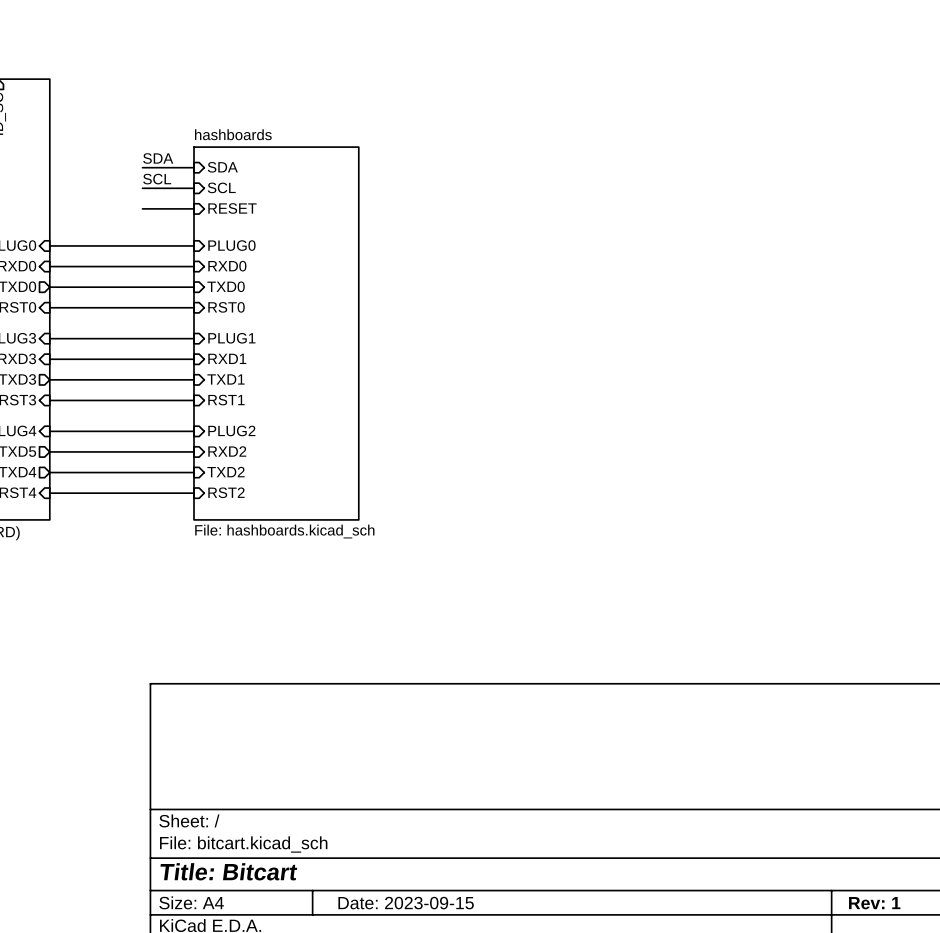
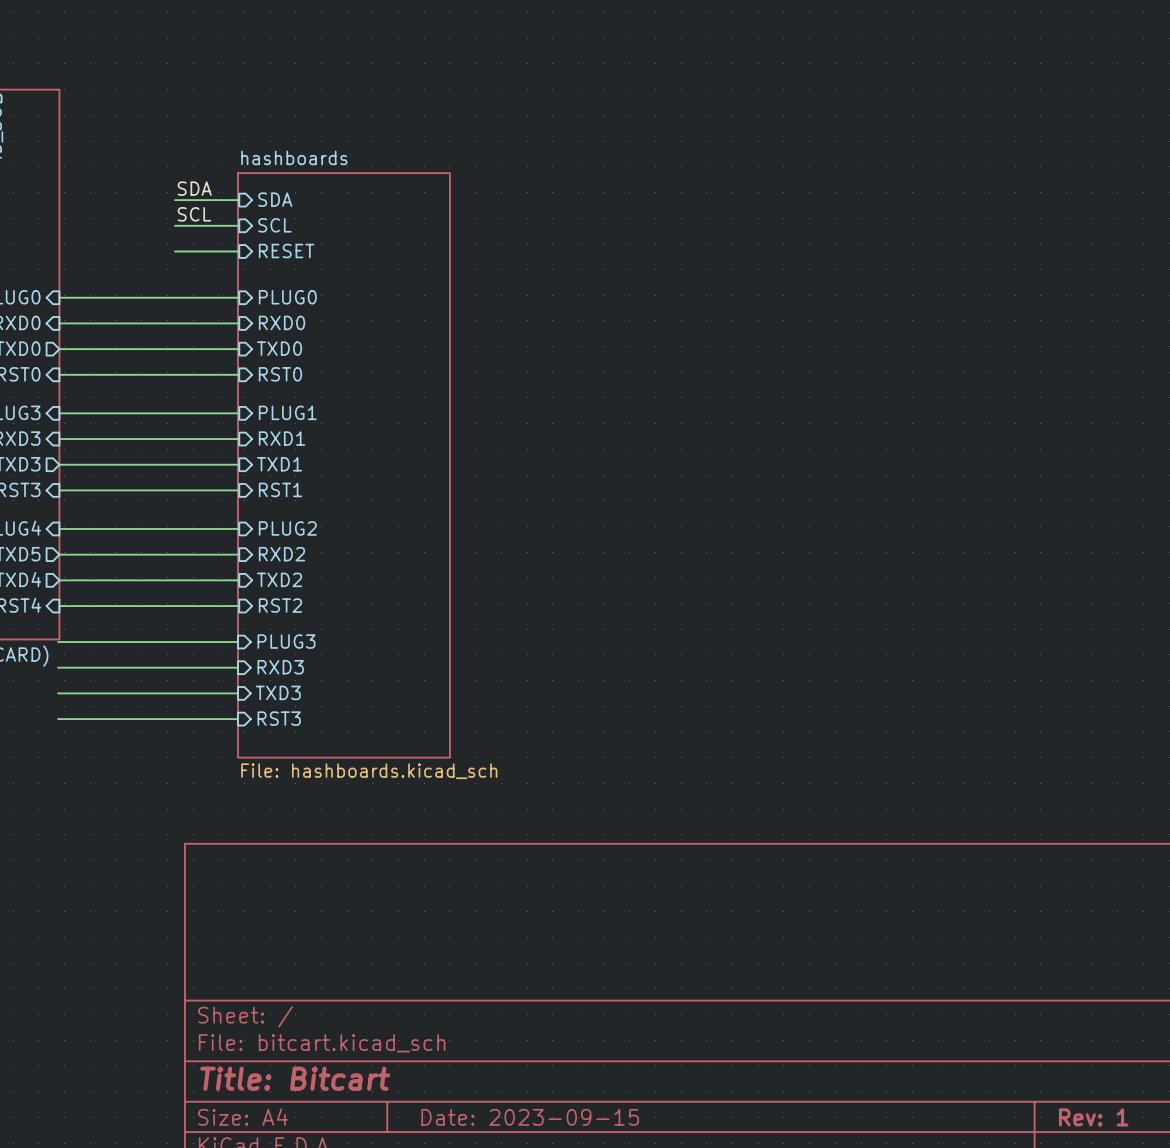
sheet hashboards: File: hashboards.kicad_sch (276, 333) -> none
sheet hashboards: none -> File: hashboards.kicad_sch (343, 465)
wire: none -> (58, 642) (237, 642)
sheet pin: none -> PLUG3 (286, 641)
wire: none -> (58, 667) (237, 667)
sheet pin: none -> RXD3 (280, 667)
sheet pin: none -> TXD3 (278, 692)
wire: none -> (58, 693) (237, 693)
wire: none -> (58, 719) (237, 719)
sheet pin: none -> RST3 (279, 718)

